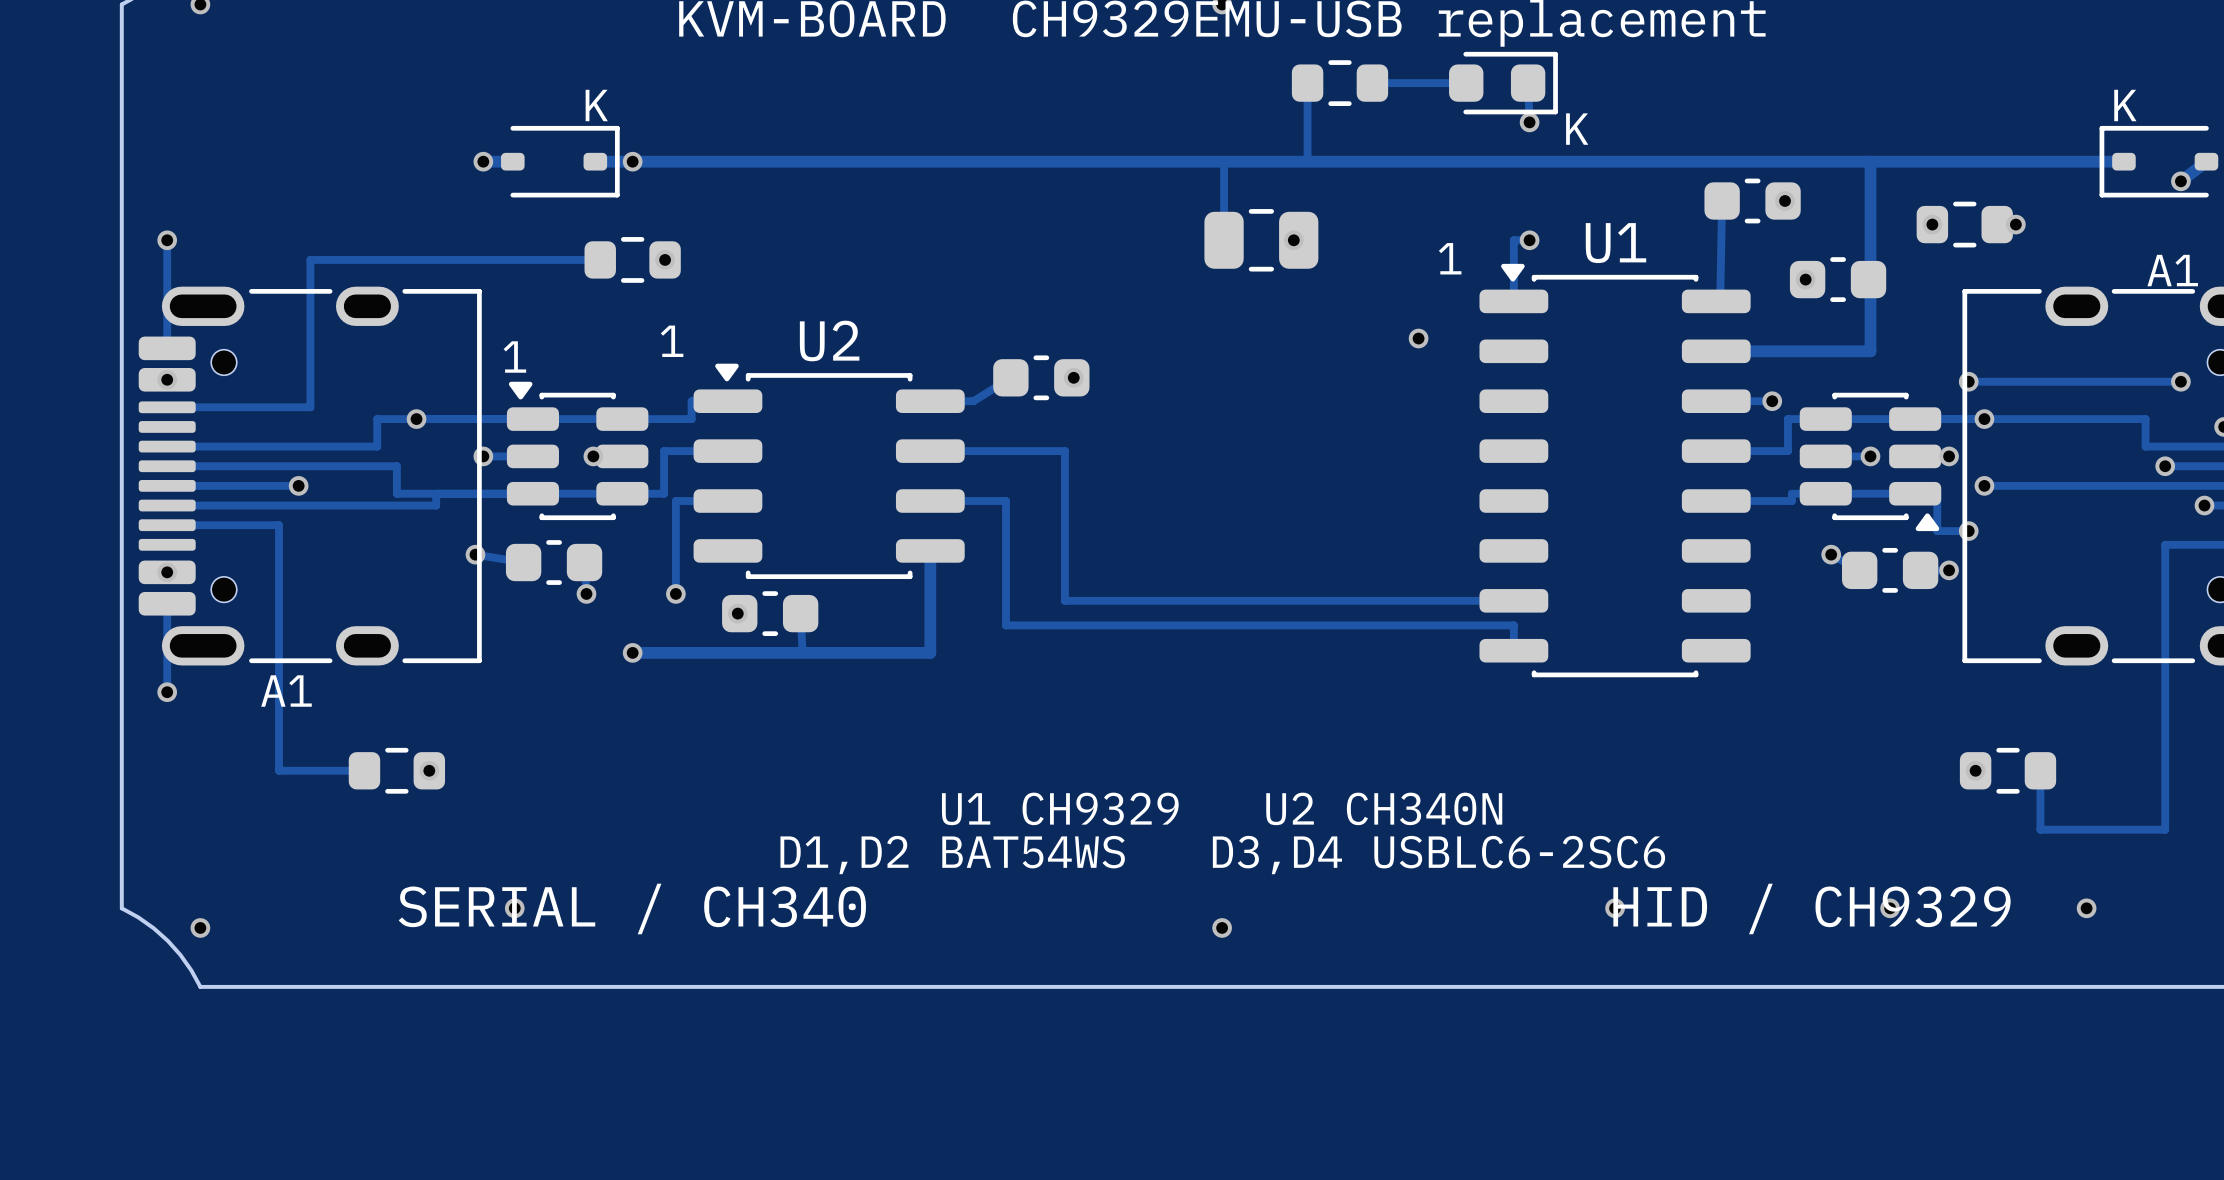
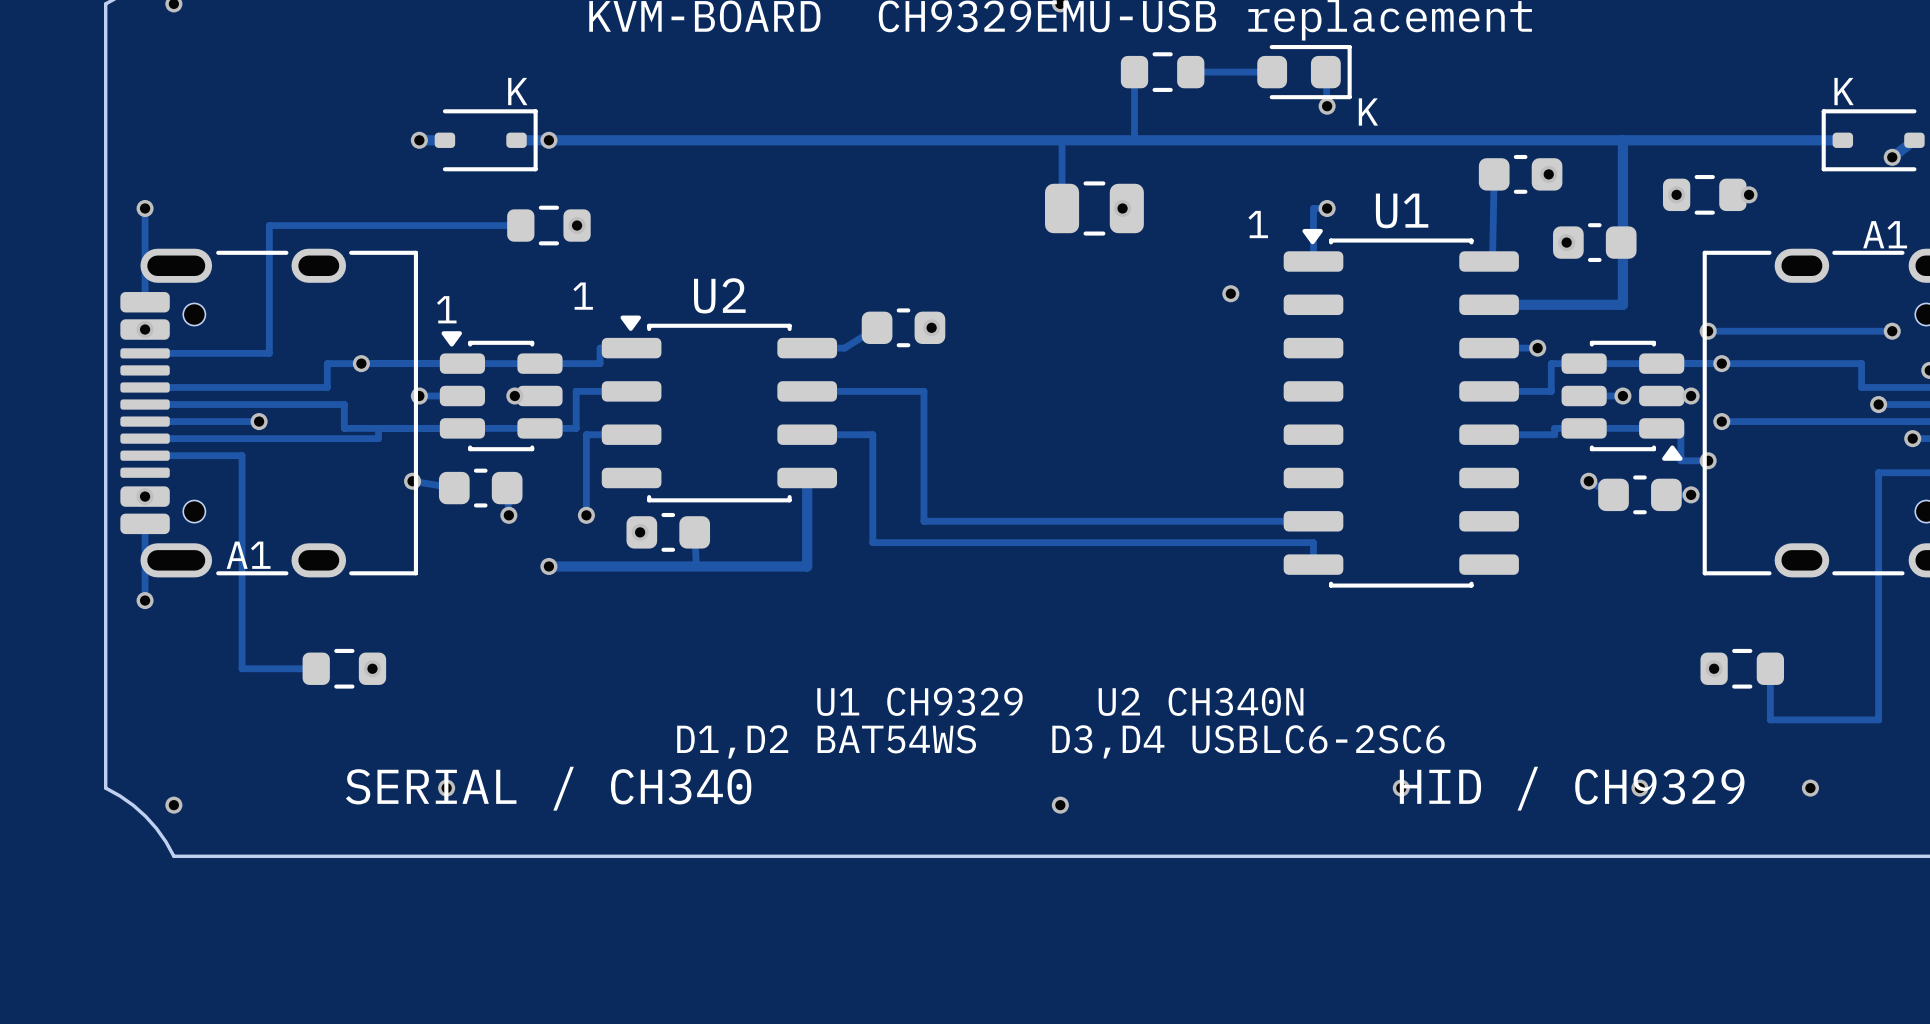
text position: A1 (286, 691) -> A1 (248, 555)

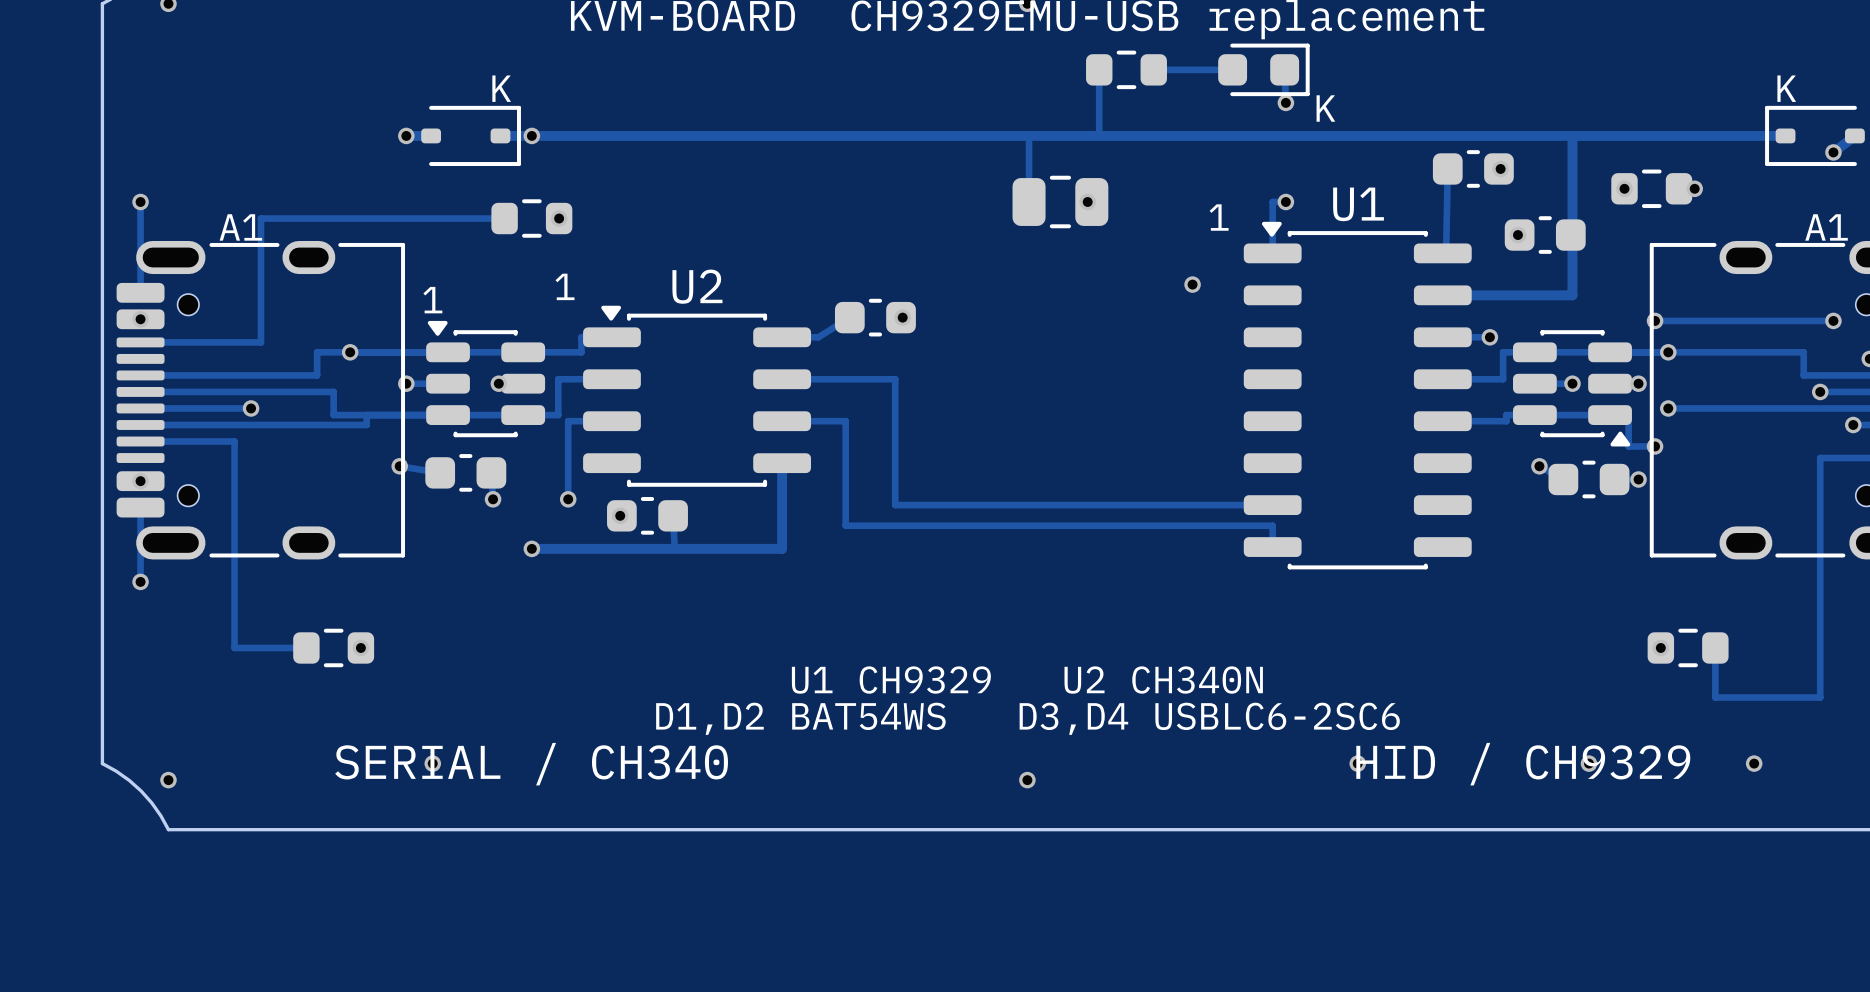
text position: A1 (248, 555) -> A1 (240, 227)

